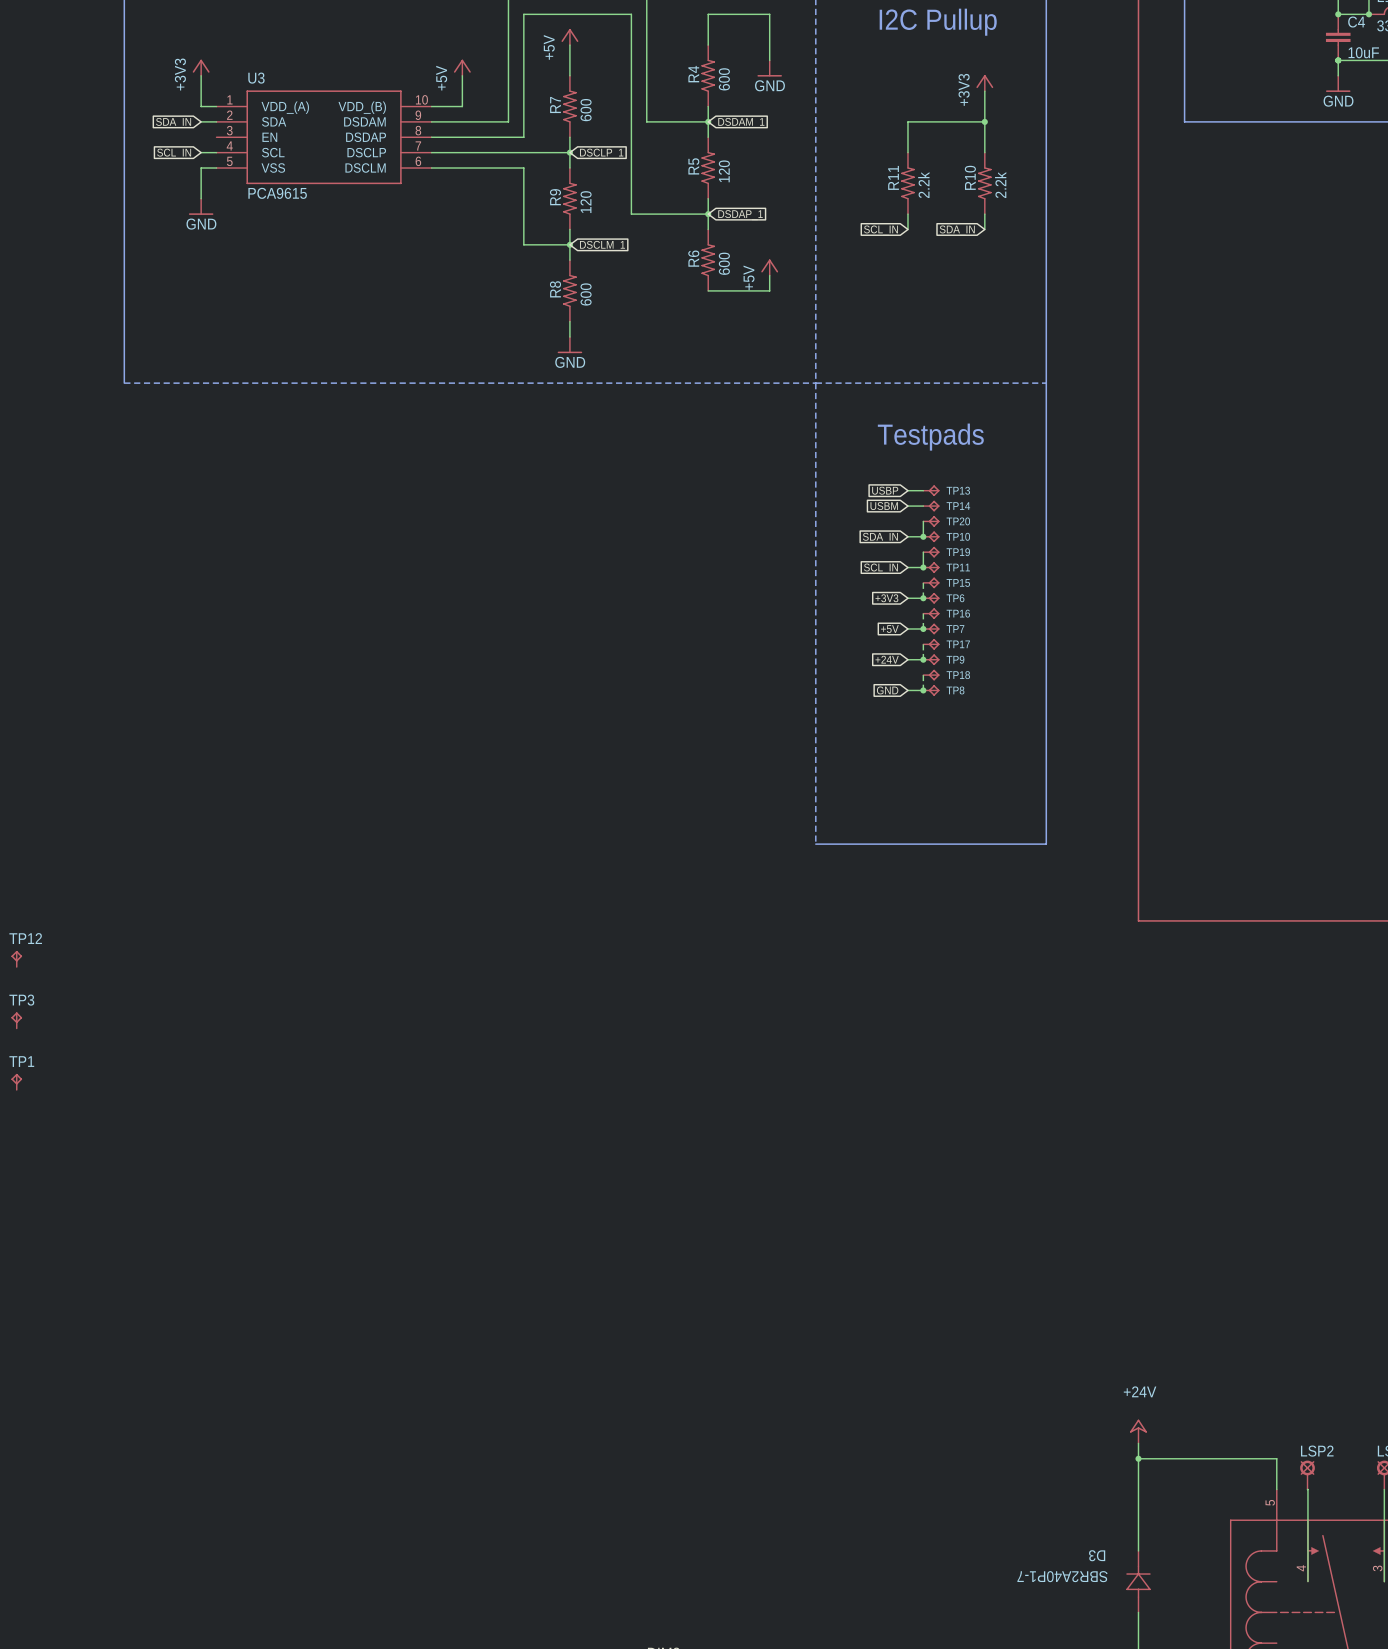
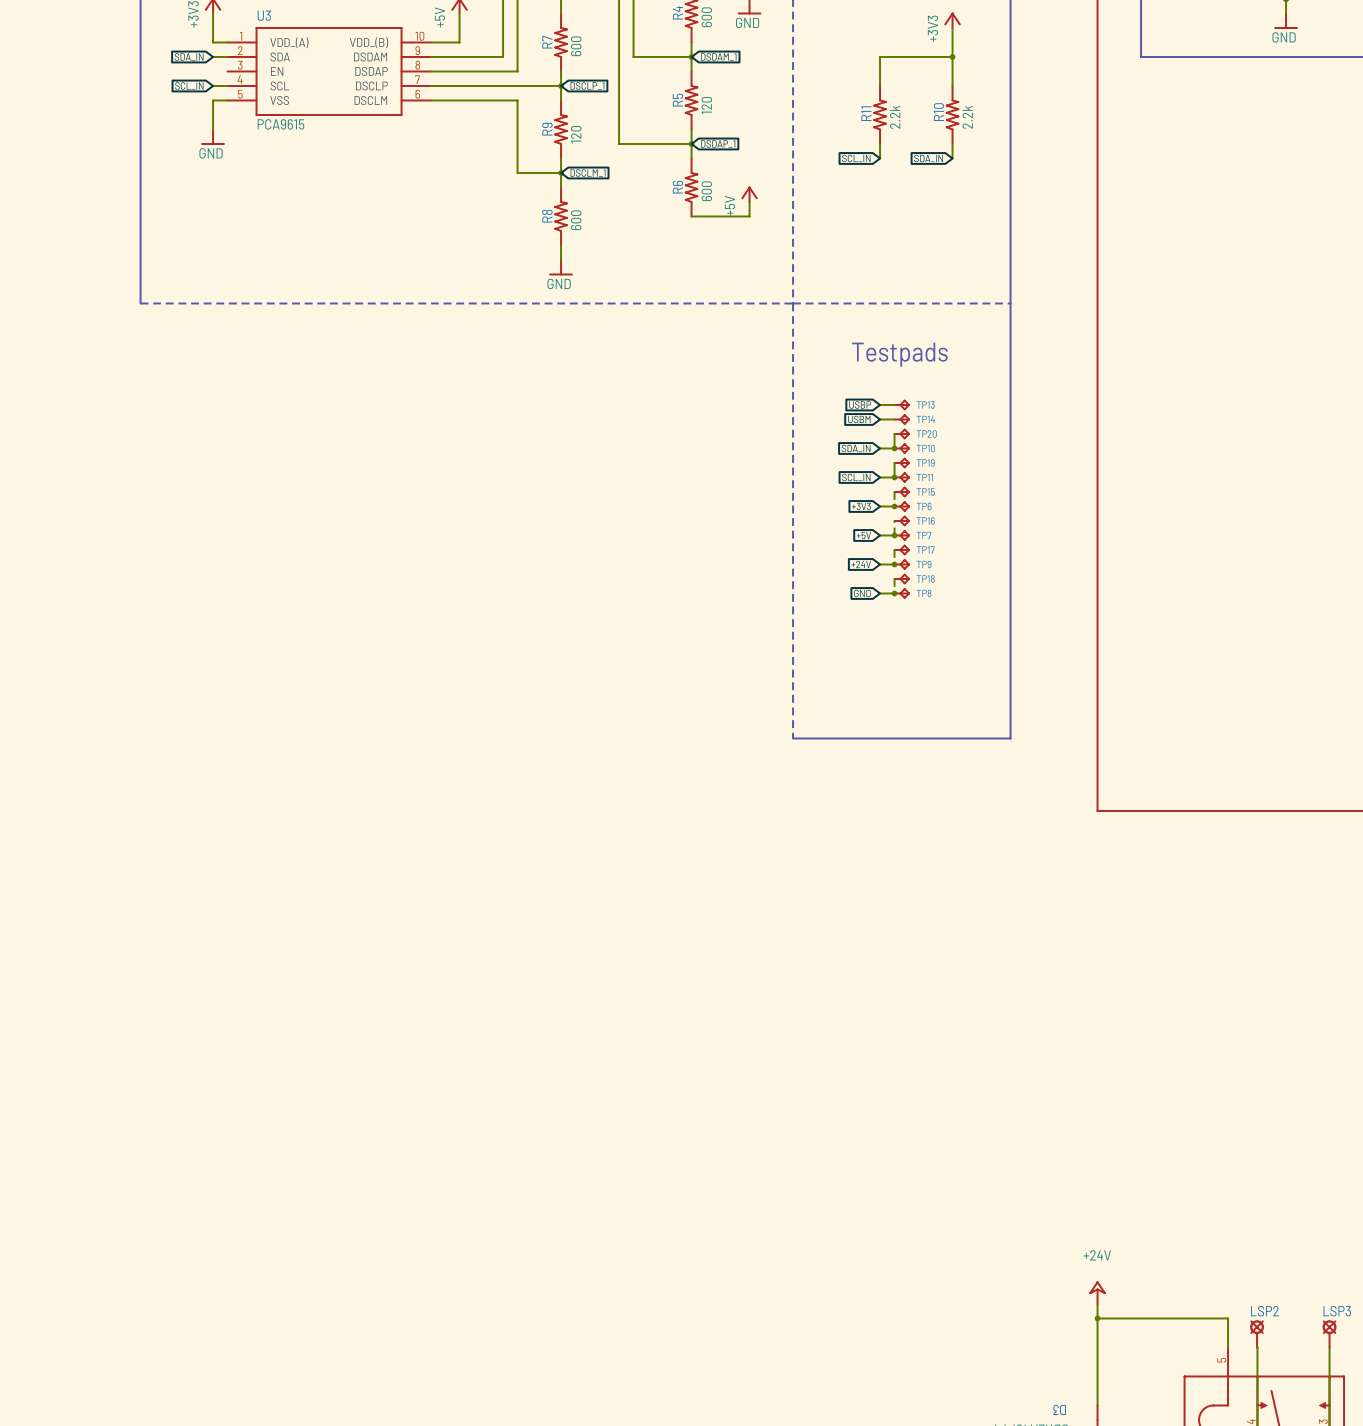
TP12: (16, 958) -> none
TP3: (16, 1020) -> none
TP1: (16, 1081) -> none

